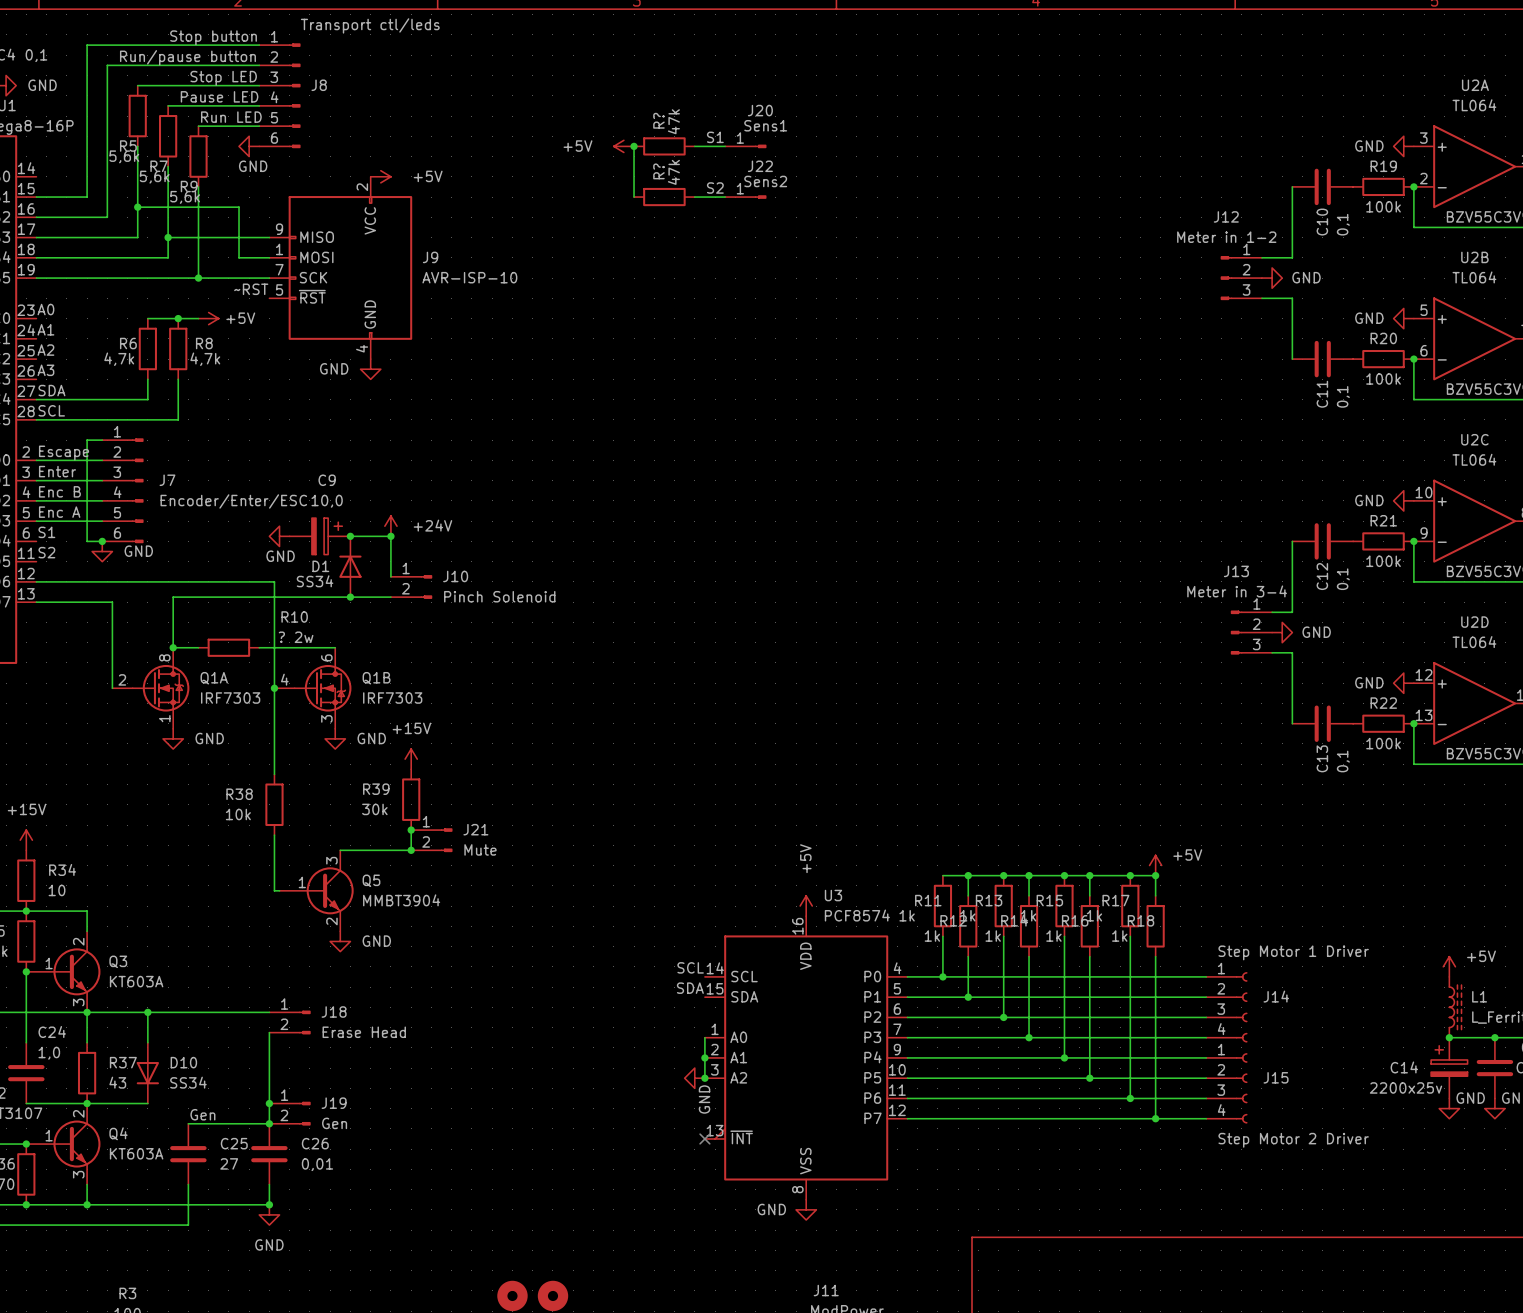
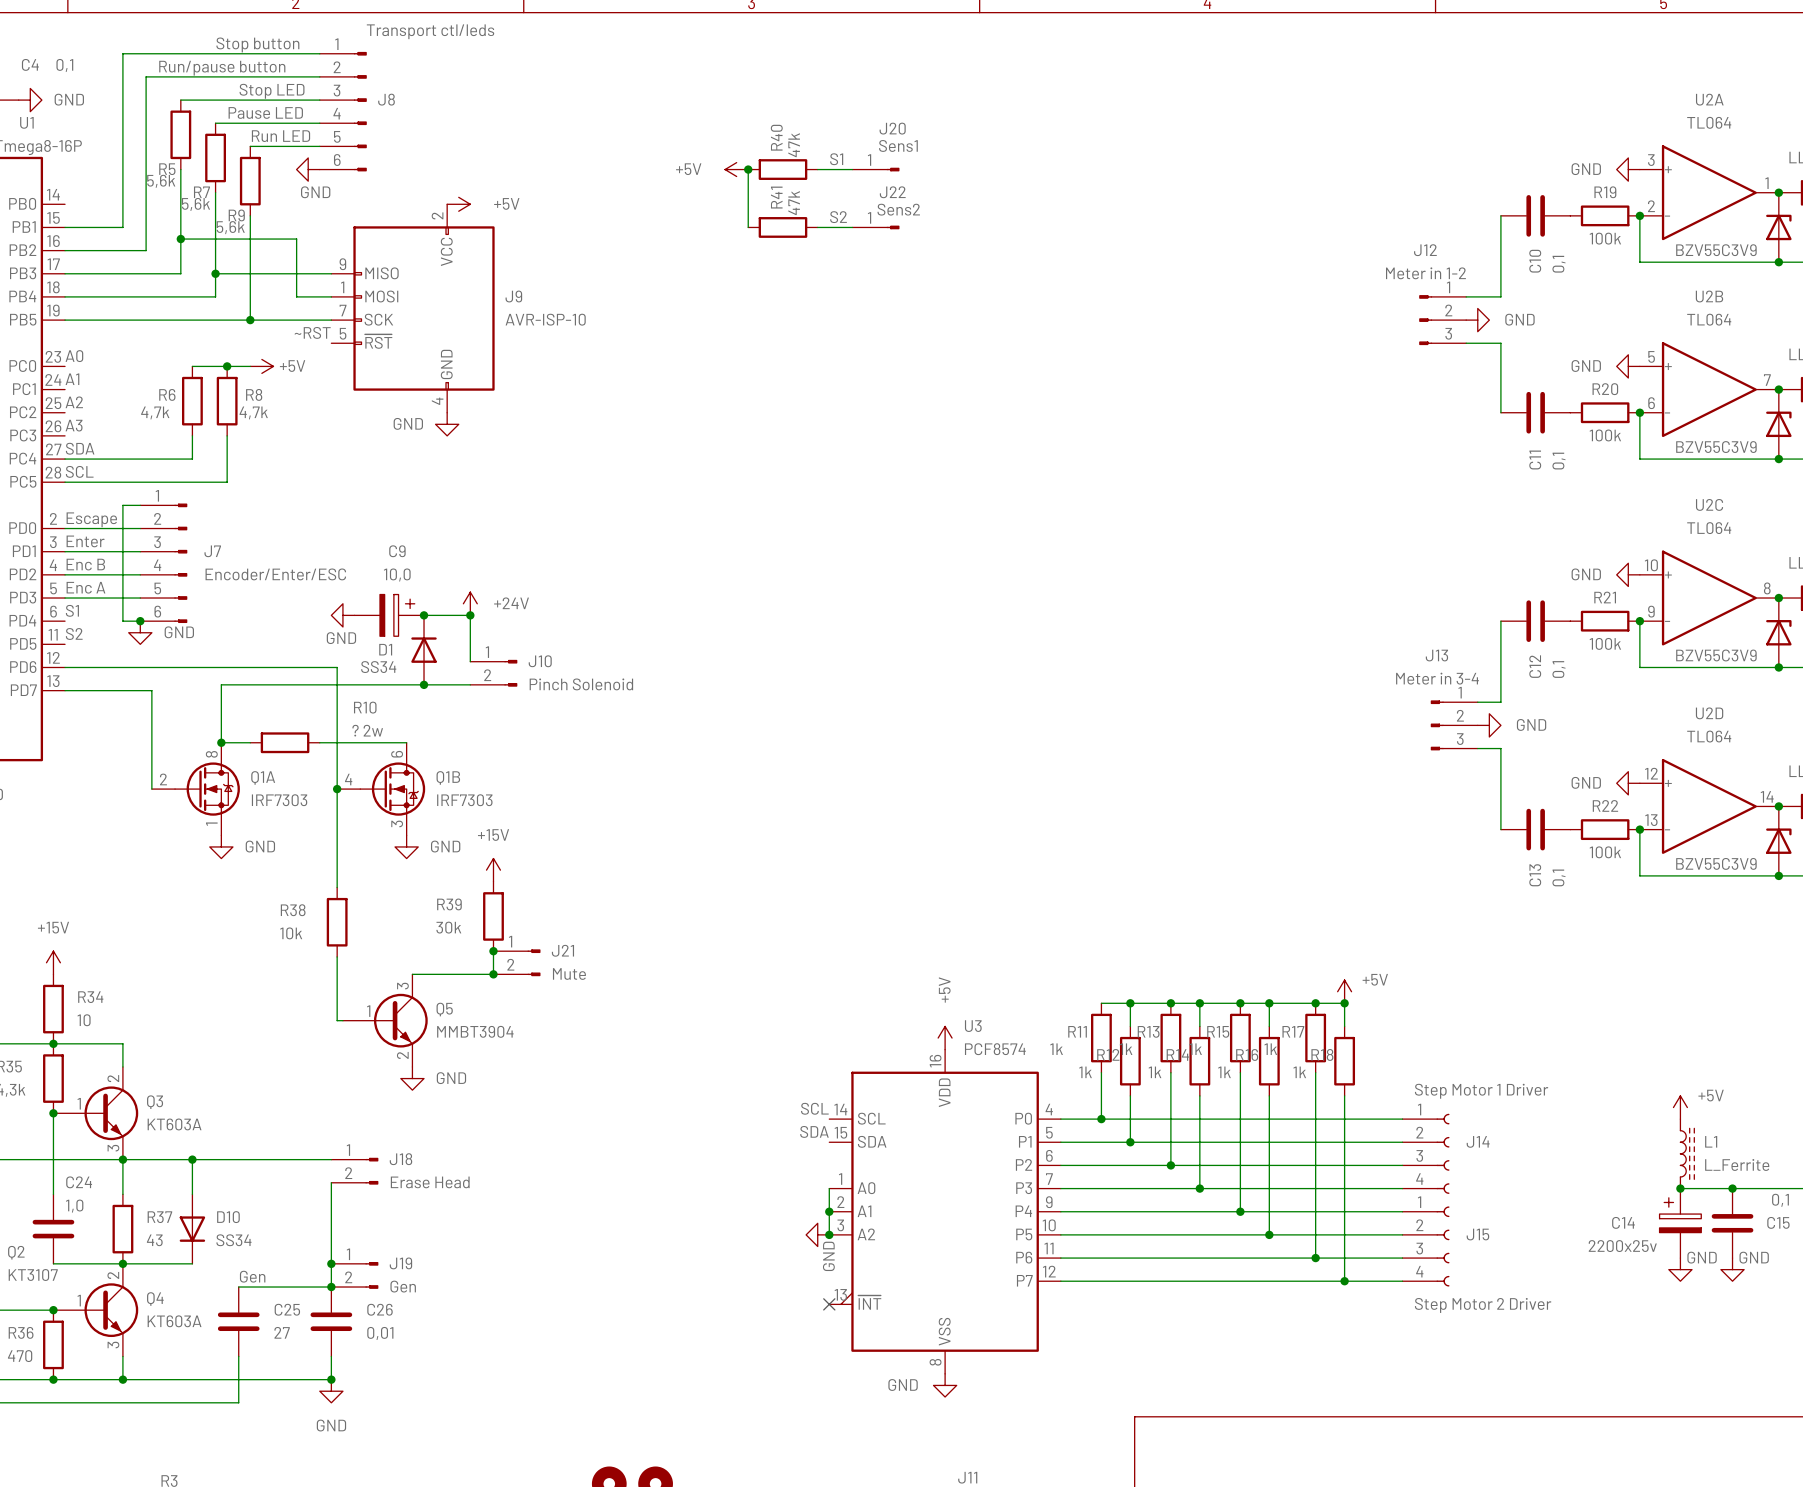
R? name: R? (658, 120) -> R40 (776, 137)
R? name: R? (658, 171) -> R41 (776, 197)

